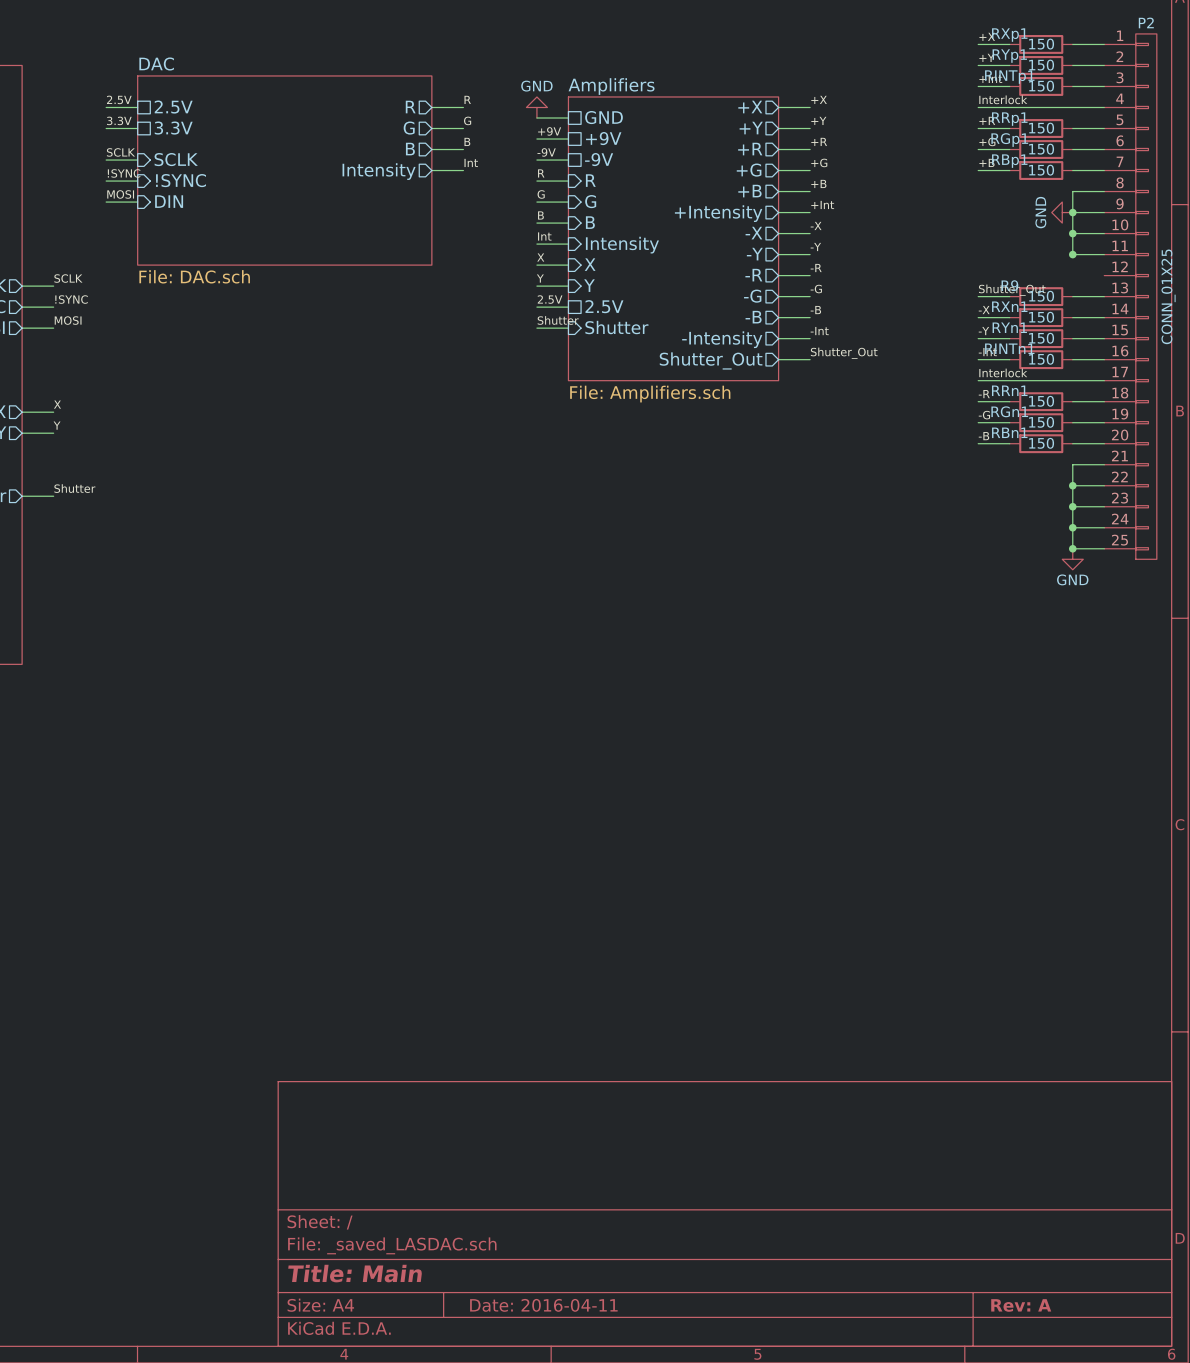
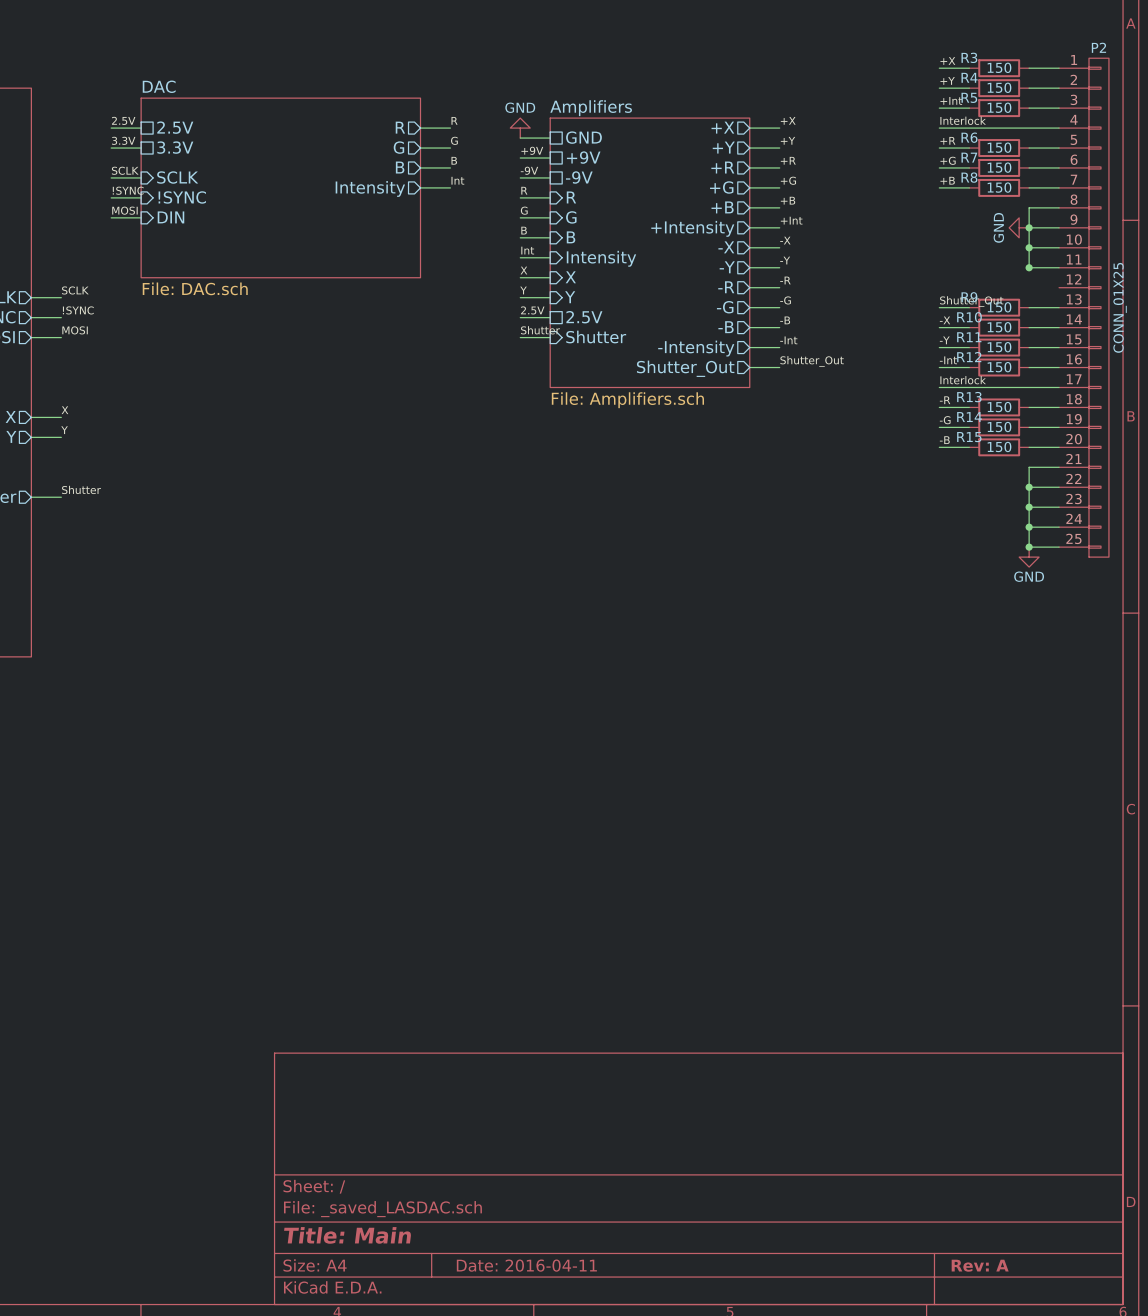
RXp1 name: RXp1 (1009, 35) -> R3 (969, 57)
RYp1 name: RYp1 (1009, 56) -> R4 (969, 77)
RINTp1 name: RINTp1 (1009, 77) -> R5 (969, 97)
RRp1 name: RRp1 (1009, 119) -> R6 (969, 137)
RGp1 name: RGp1 (1009, 140) -> R7 (969, 157)
RBp1 name: RBp1 (1009, 161) -> R8 (969, 177)
RXn1 name: RXn1 (1009, 306) -> R10 (969, 317)
RYn1 name: RYn1 (1009, 327) -> R11 (969, 337)
RINTn1 name: RINTn1 (1009, 348) -> R12 (969, 357)
RRn1 name: RRn1 (1009, 390) -> R13 (969, 397)
RGn1 name: RGn1 (1009, 411) -> R14 (969, 417)
RBn1 name: RBn1 (1009, 432) -> R15 (969, 437)

